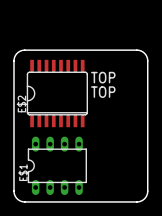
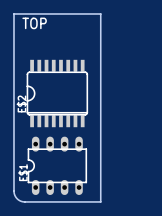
text: none -> TOP (34, 23)
board edge: (13, 60) (17, 53) (24, 50) (136, 50) (146, 55) (147, 193) (143, 199) (138, 201) (100, 201) -> (13, 60) (13, 13) (100, 13) (100, 201)
text: TOP (103, 77) -> none
text: TOP (103, 92) -> none

